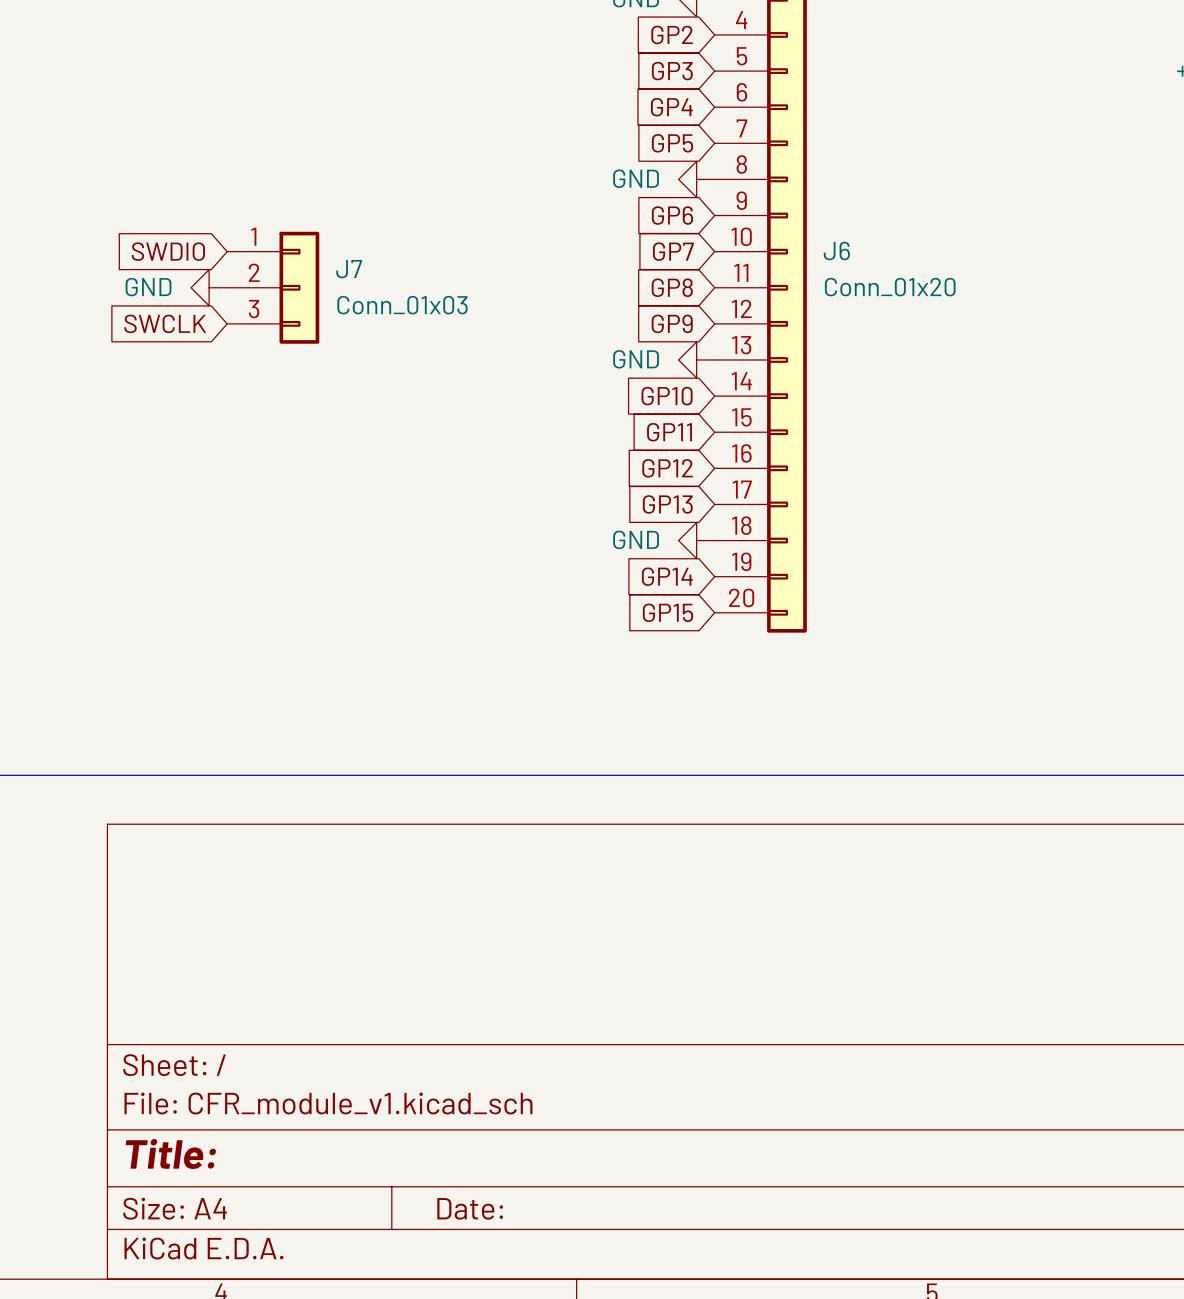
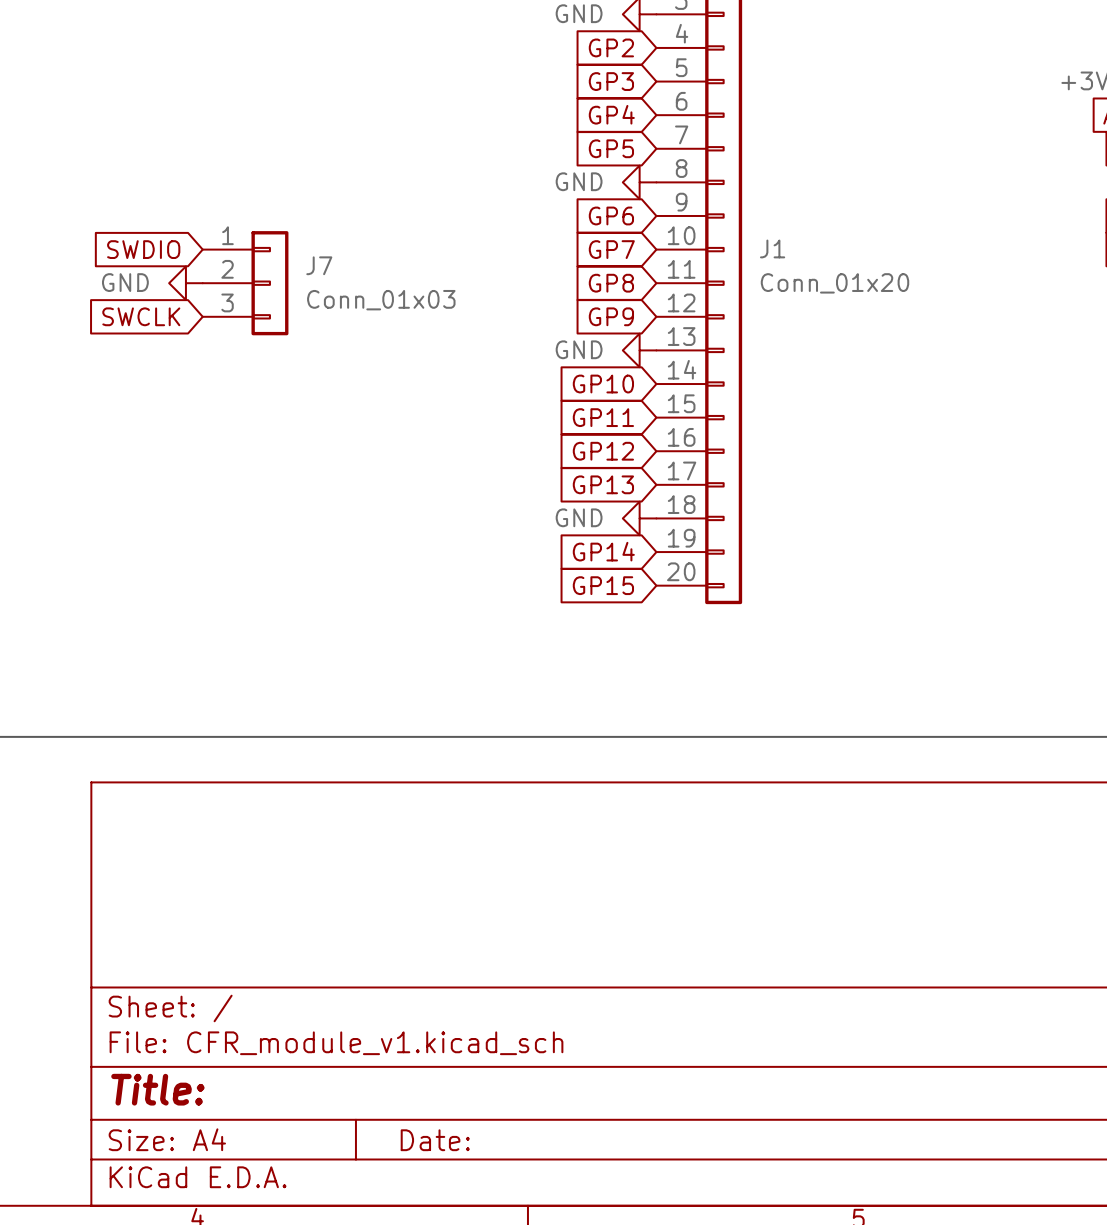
J6 name: J6 (836, 250) -> J1 (772, 248)

